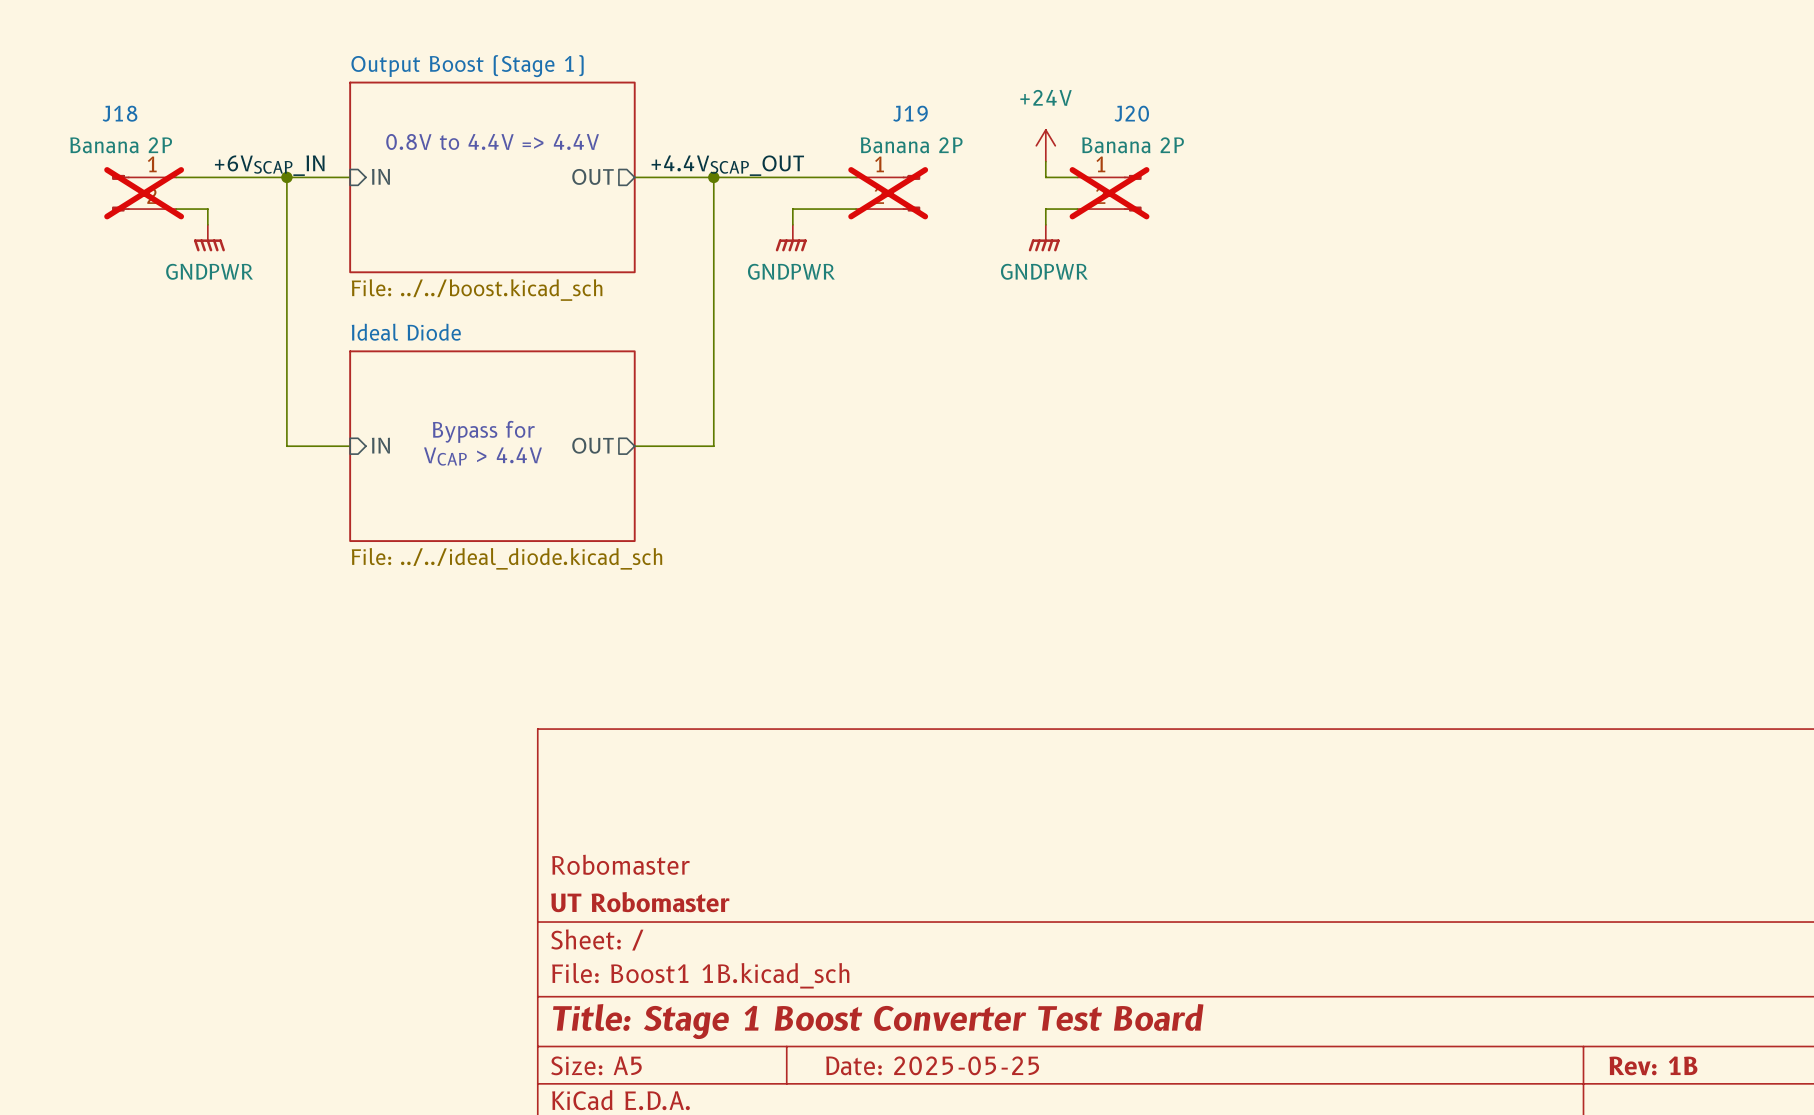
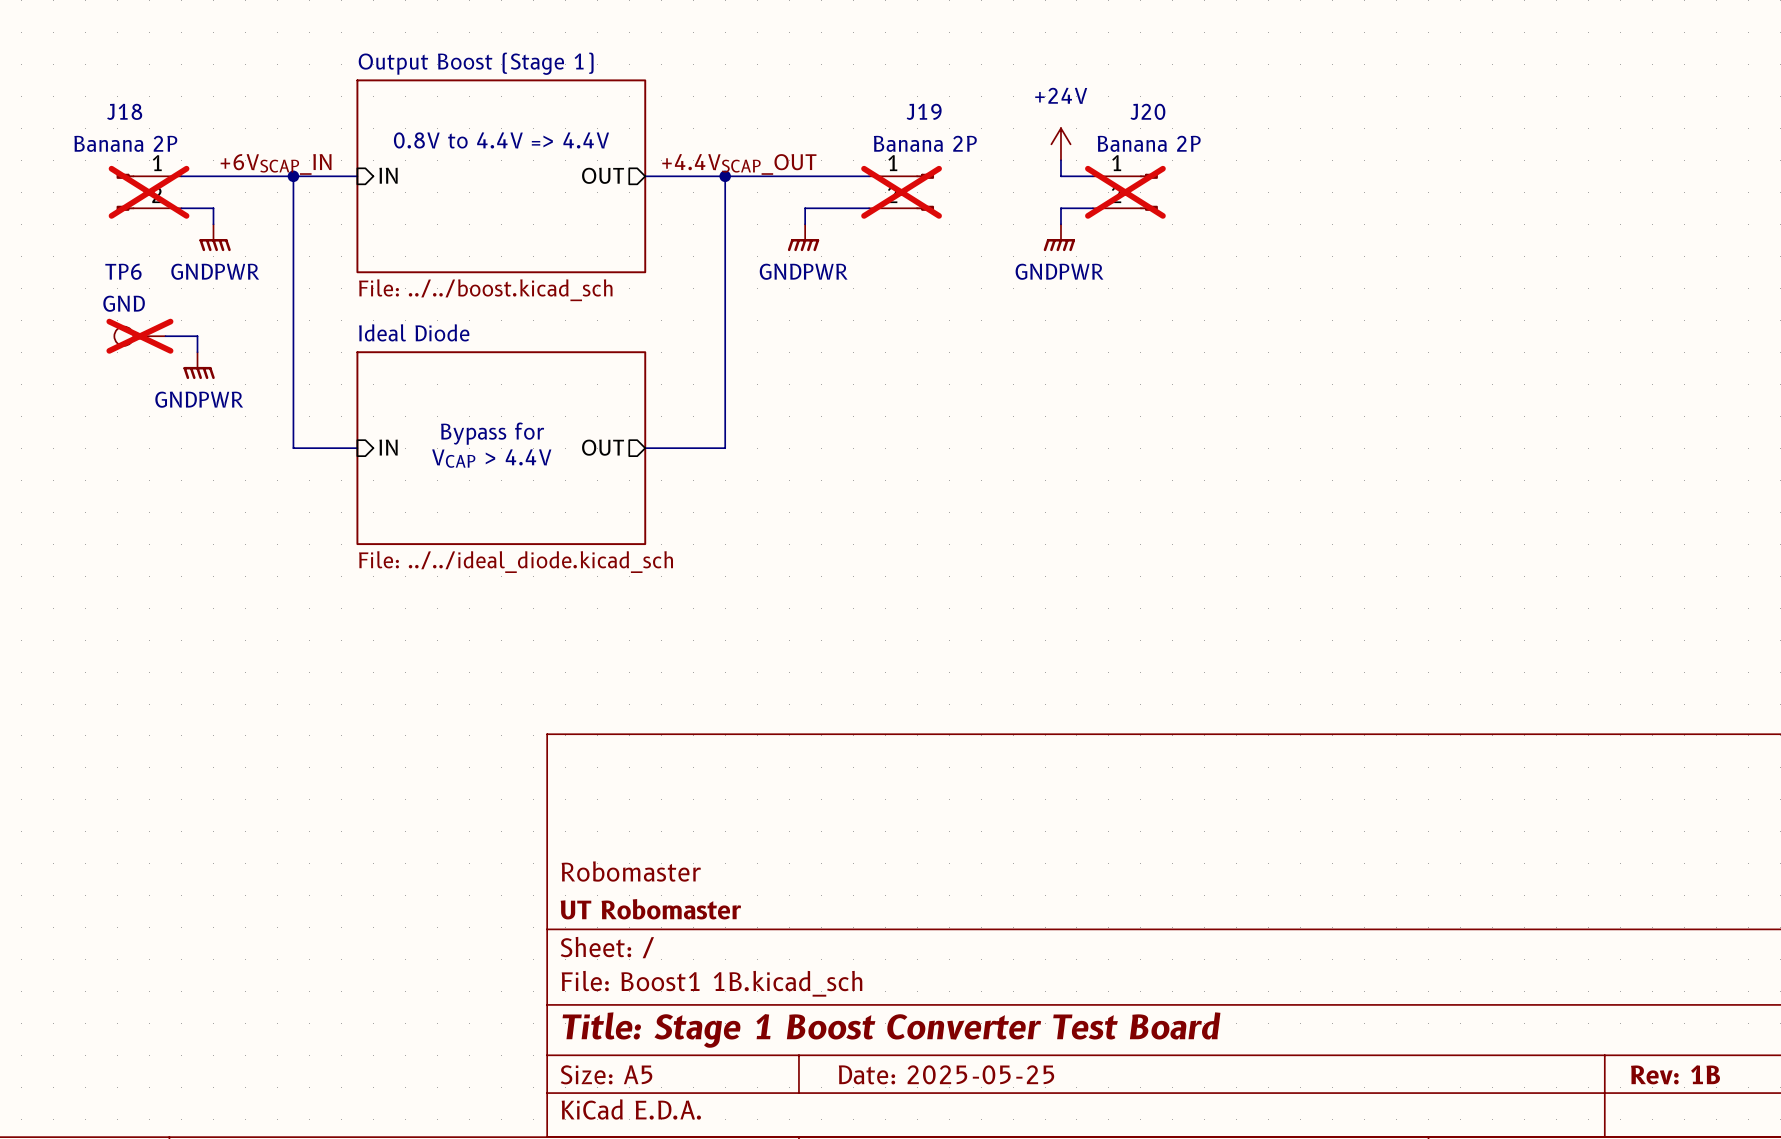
TP6: none -> GND (139, 336)
wire: none -> (165, 336) (197, 336) (197, 352)
power symbol: none -> GNDPWR (199, 365)

